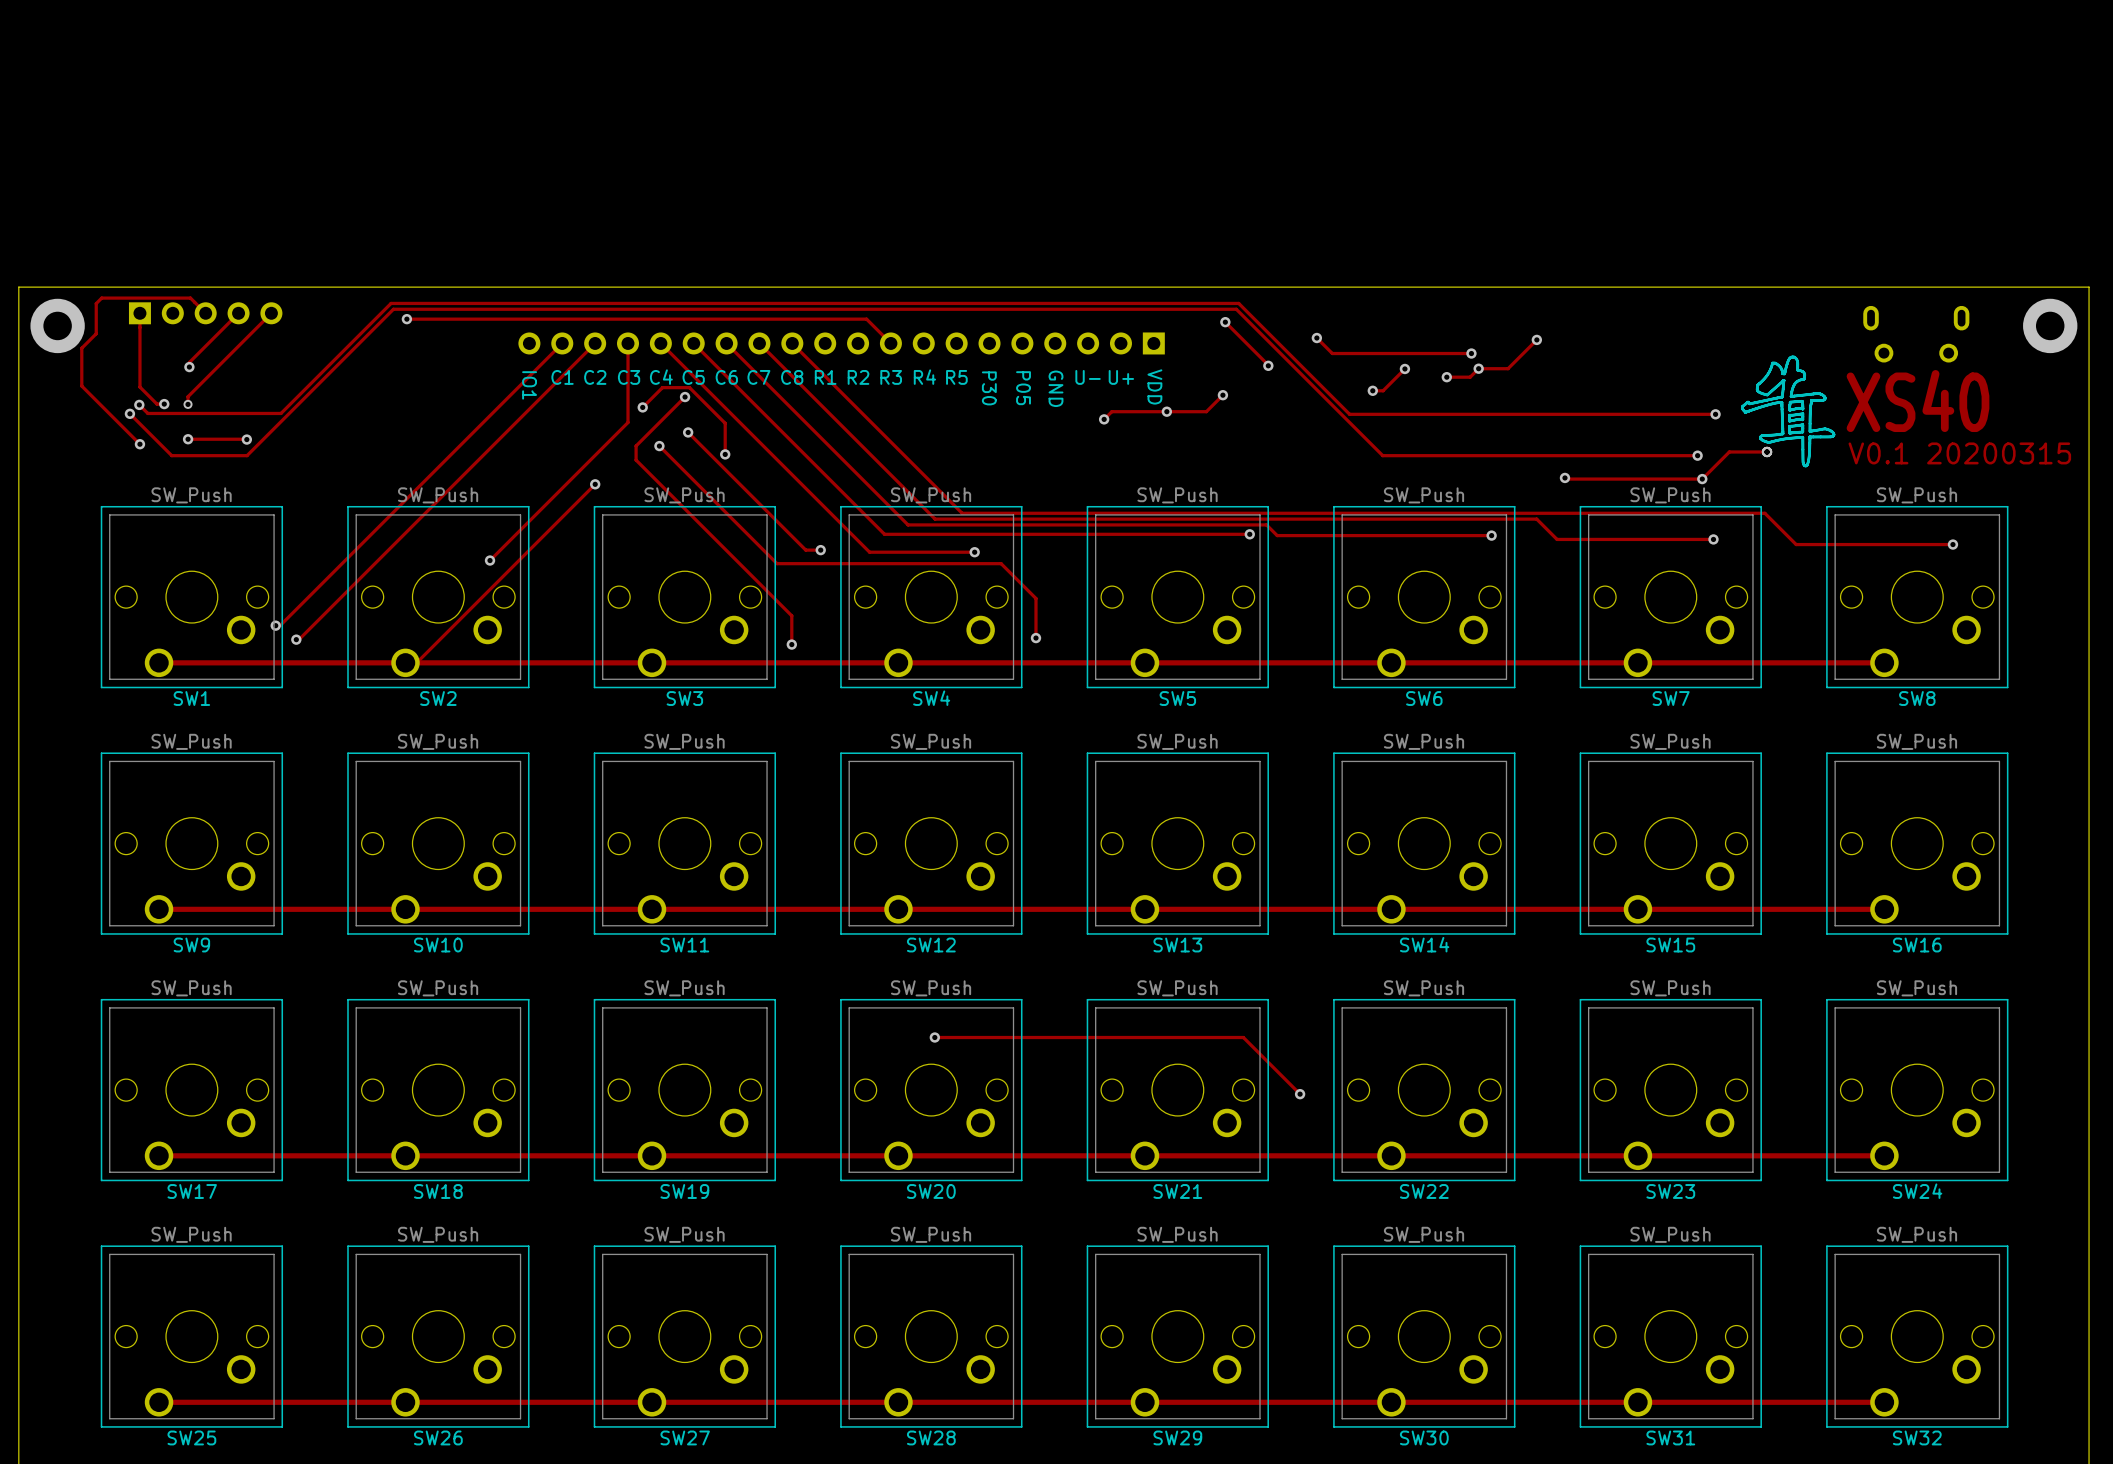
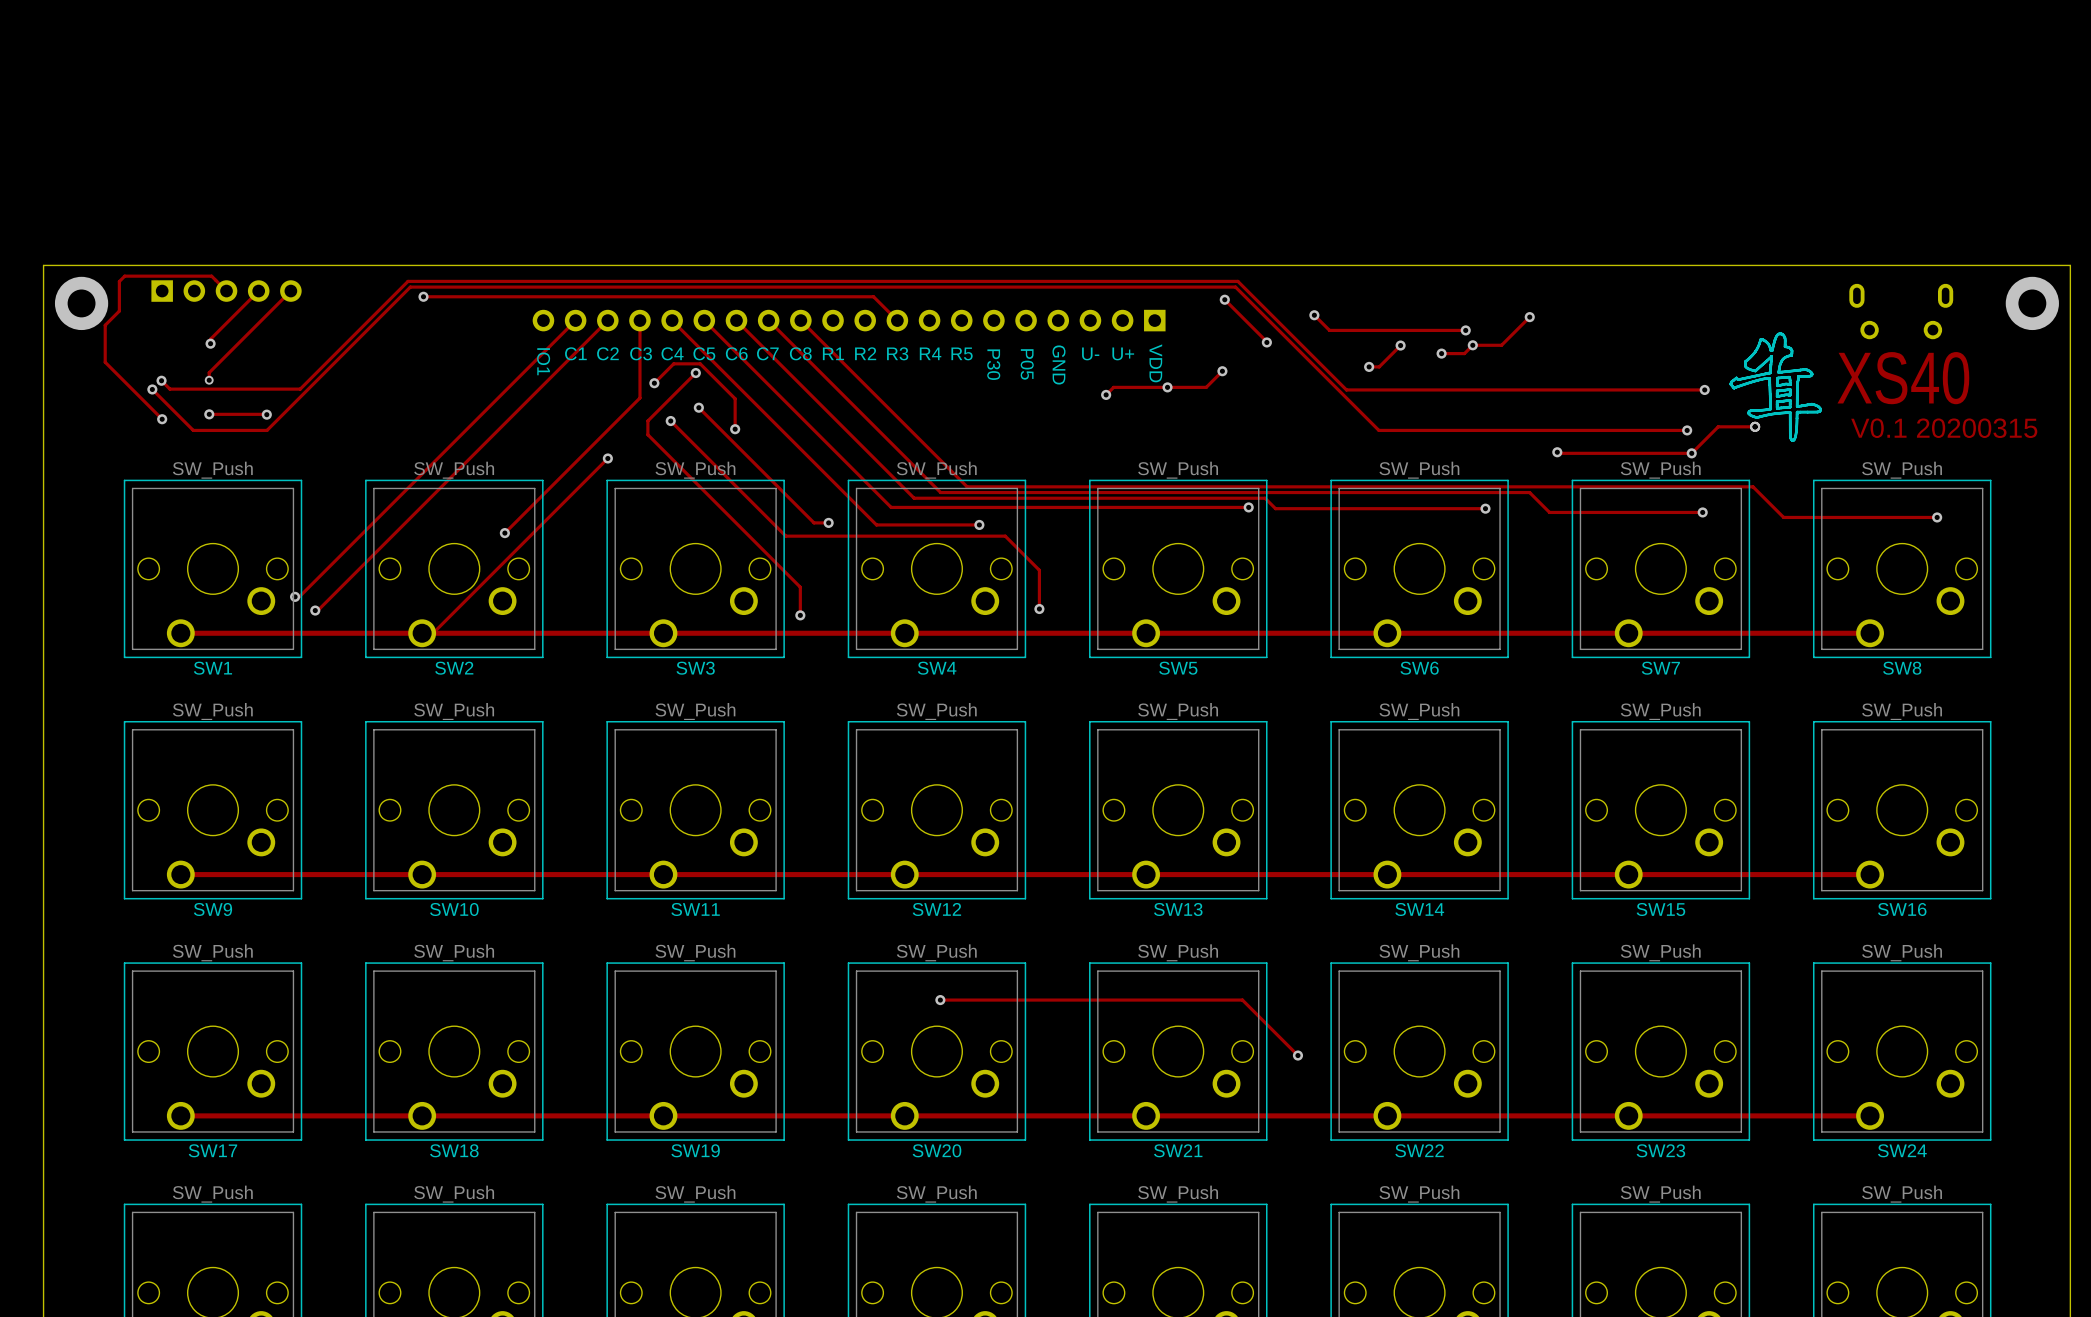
track: (139, 313) (139, 387) (156, 404) (164, 404) -> none
via: (164, 404) -> none

